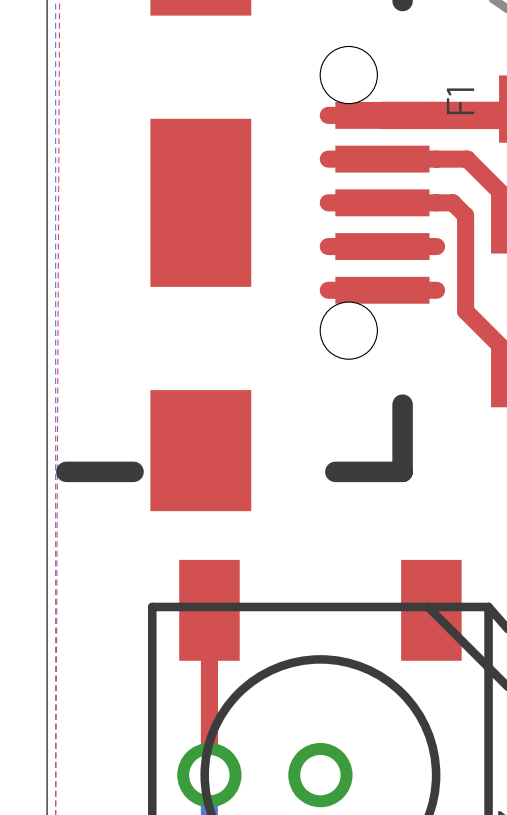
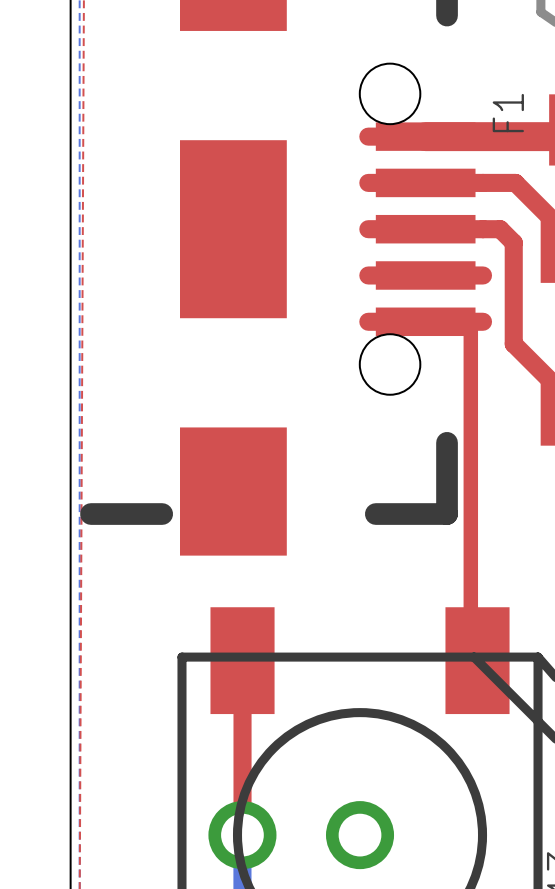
top track: none -> (425, 321) (470, 326) (470, 658) (477, 660)

